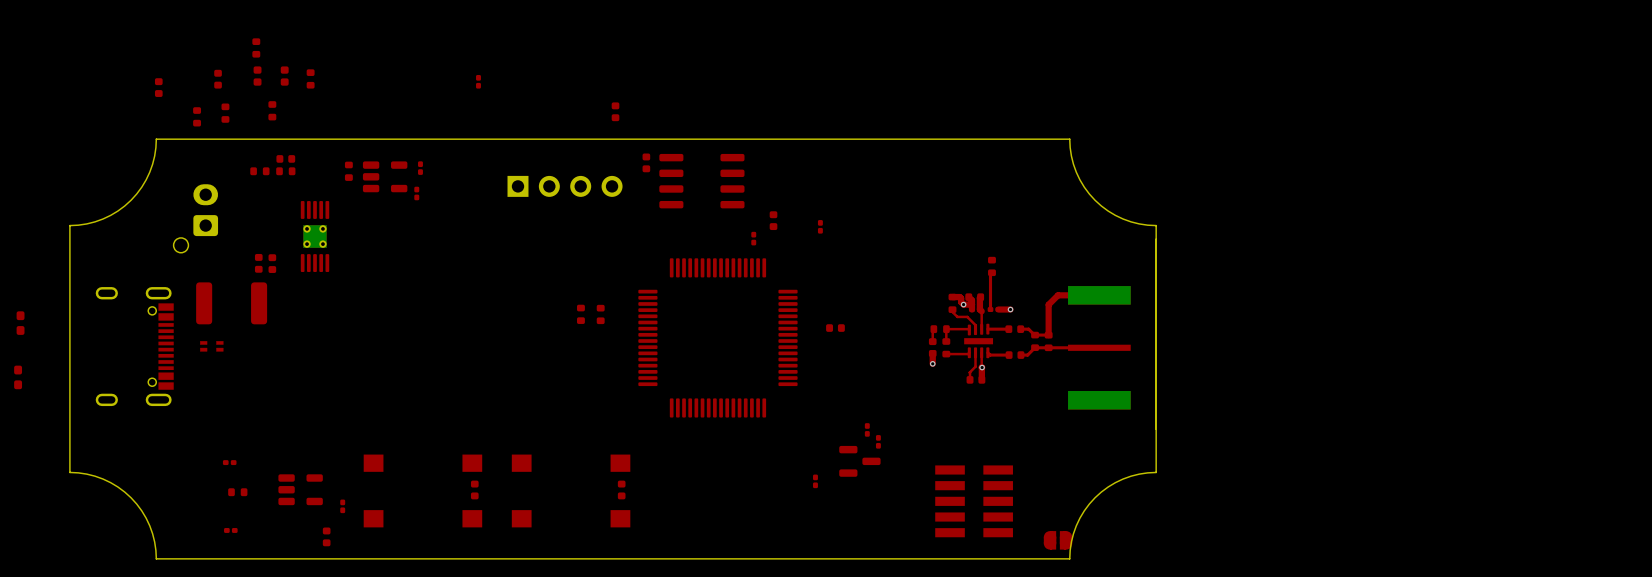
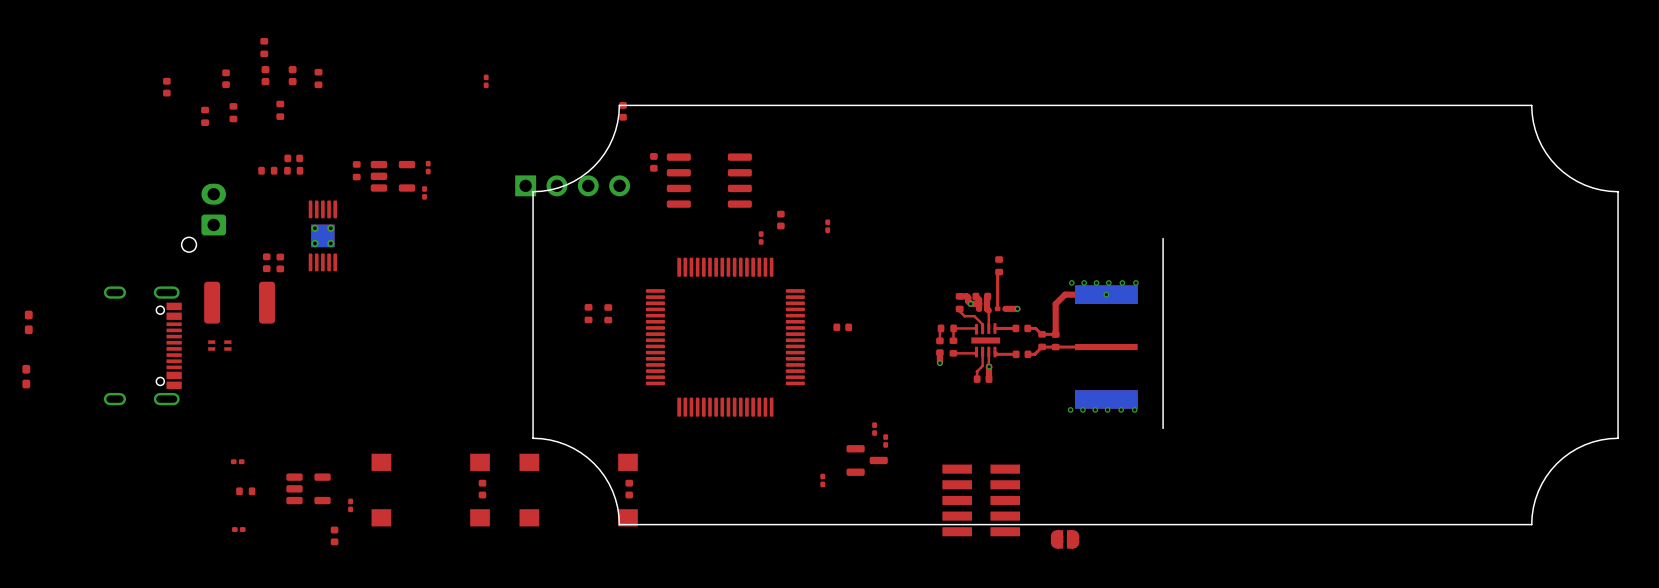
drawing: none -> [532, 104, 1619, 526]
drawing: [69, 138, 1157, 560] -> none
via: none -> (1071, 282)
via: none -> (1084, 282)
via: none -> (1096, 282)
via: none -> (1108, 282)
via: none -> (1122, 282)
via: none -> (1135, 282)
via: none -> (1106, 294)
via: none -> (1070, 409)
via: none -> (1082, 409)
via: none -> (1095, 409)
via: none -> (1107, 409)
via: none -> (1121, 409)
via: none -> (1134, 409)

